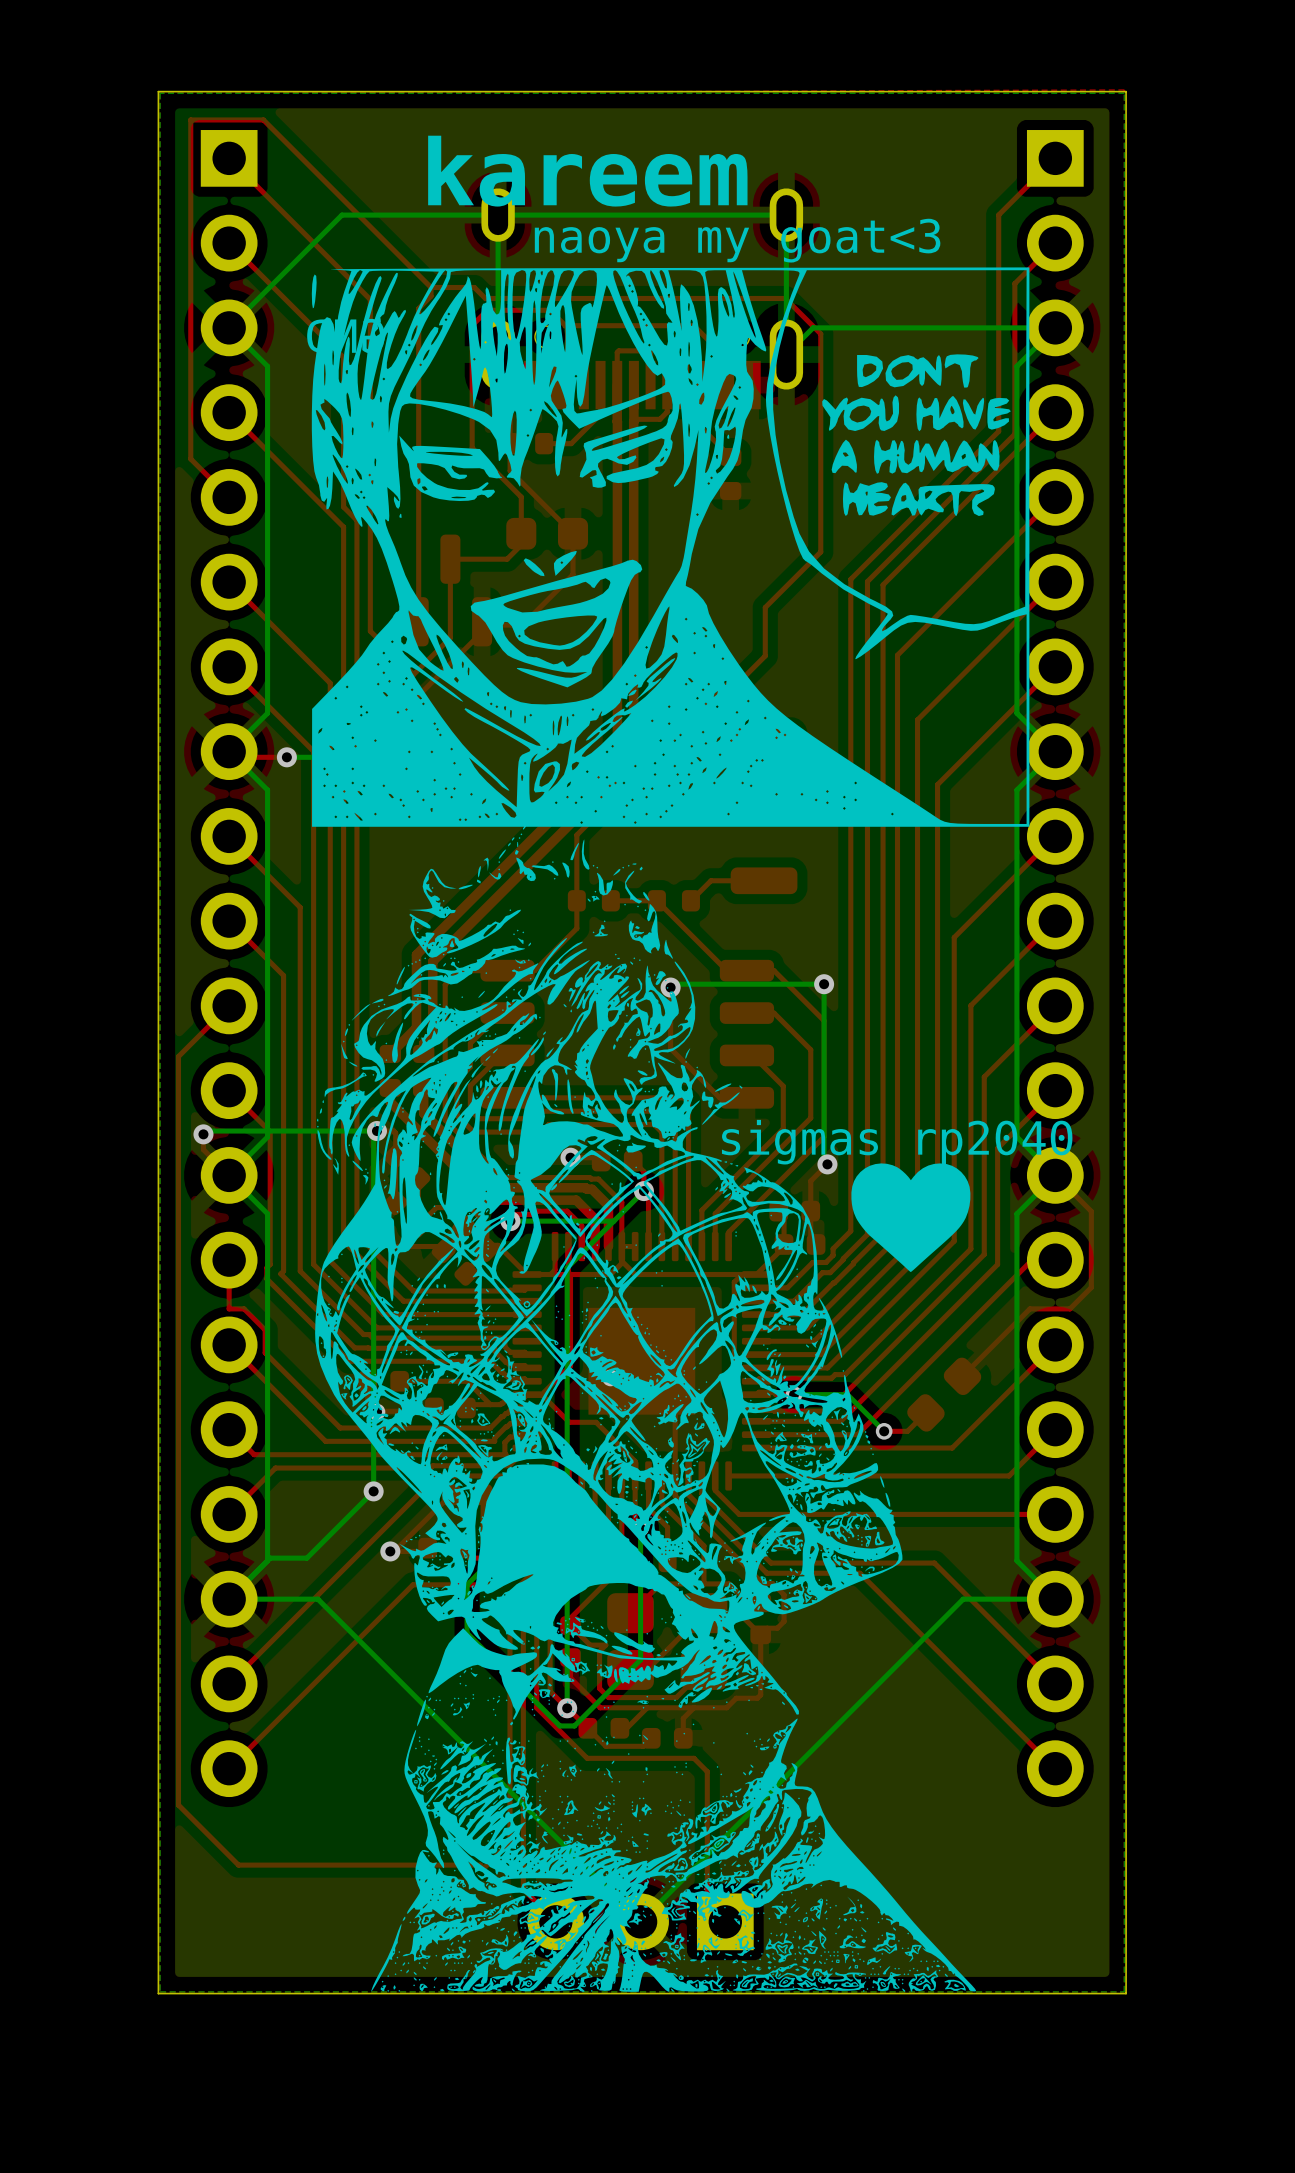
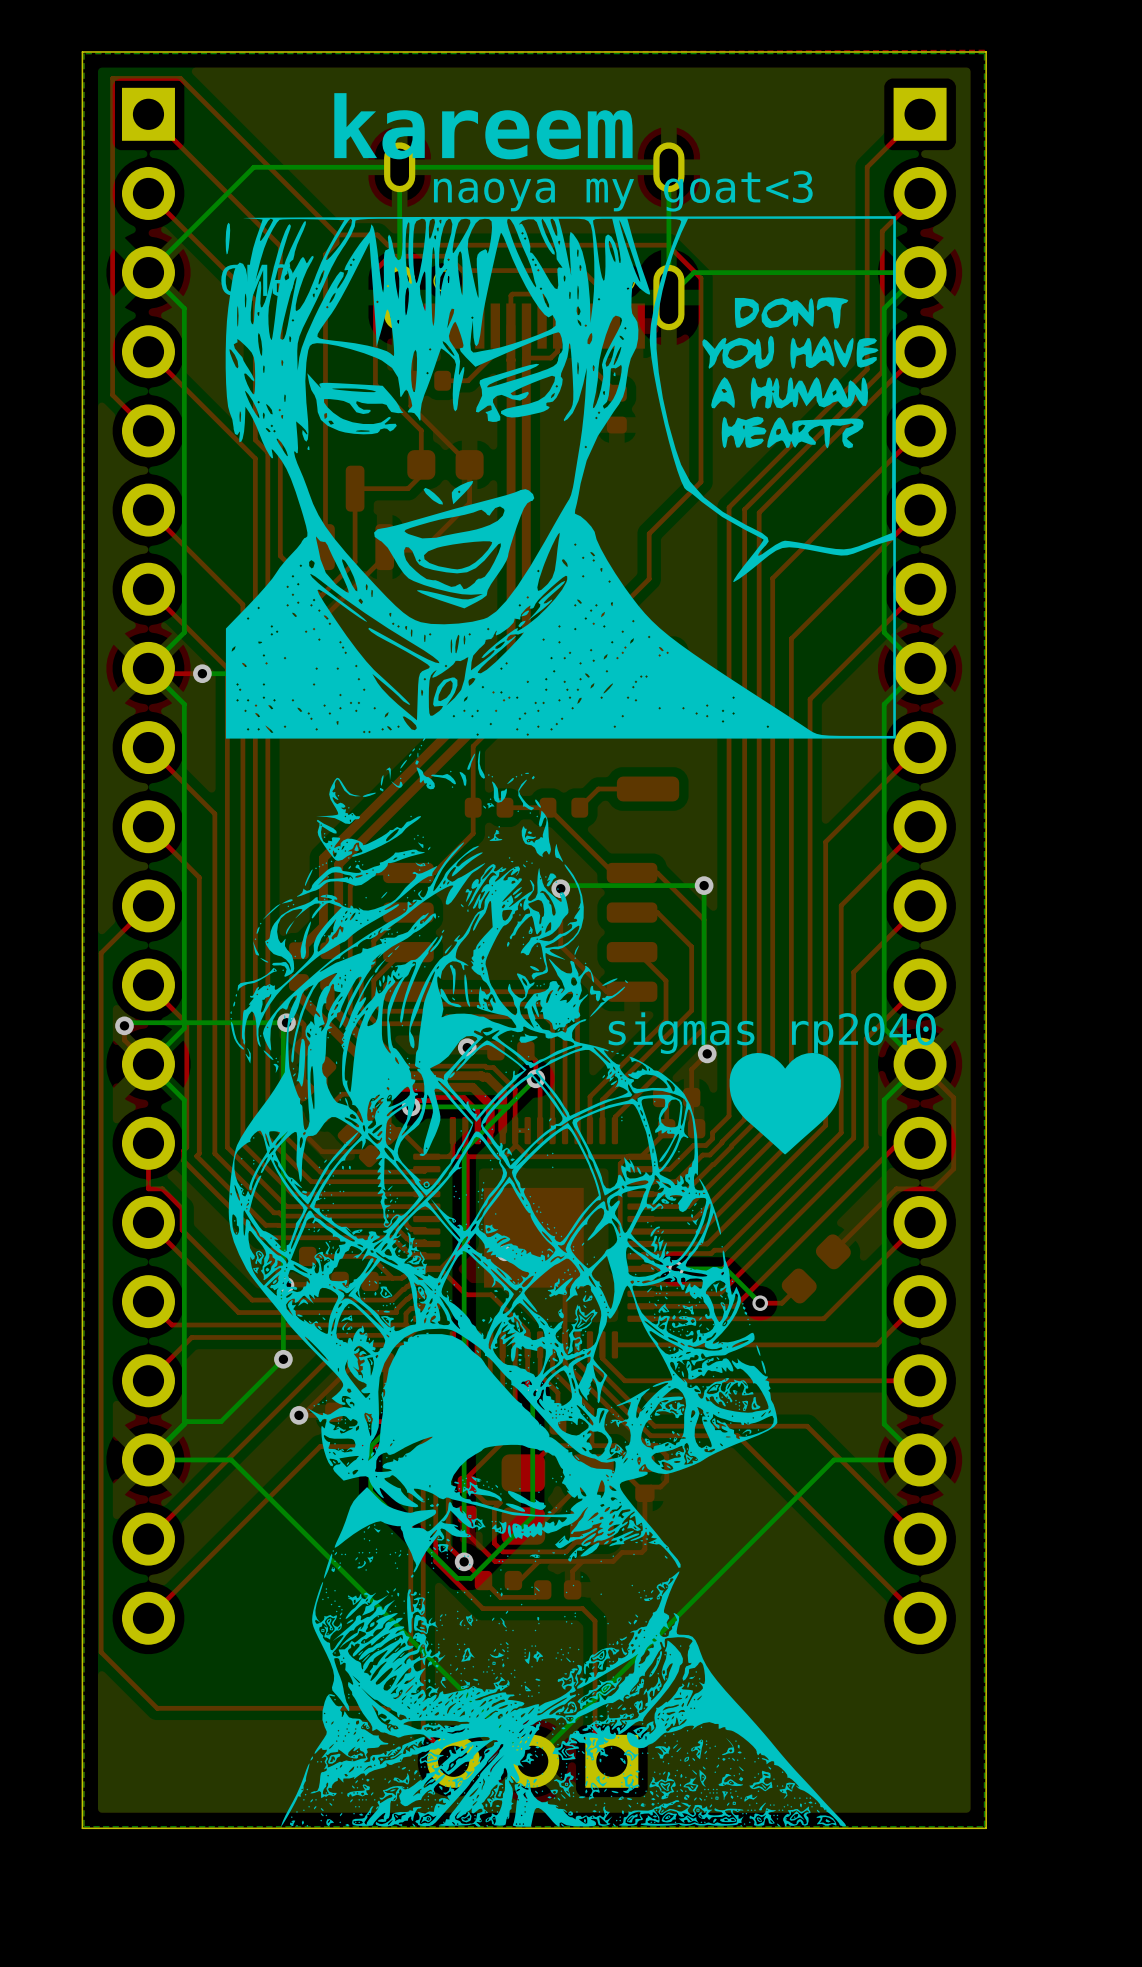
top track: (439, 1246) (392, 1246) -> (375, 1151) (322, 1151) (300, 1130)

